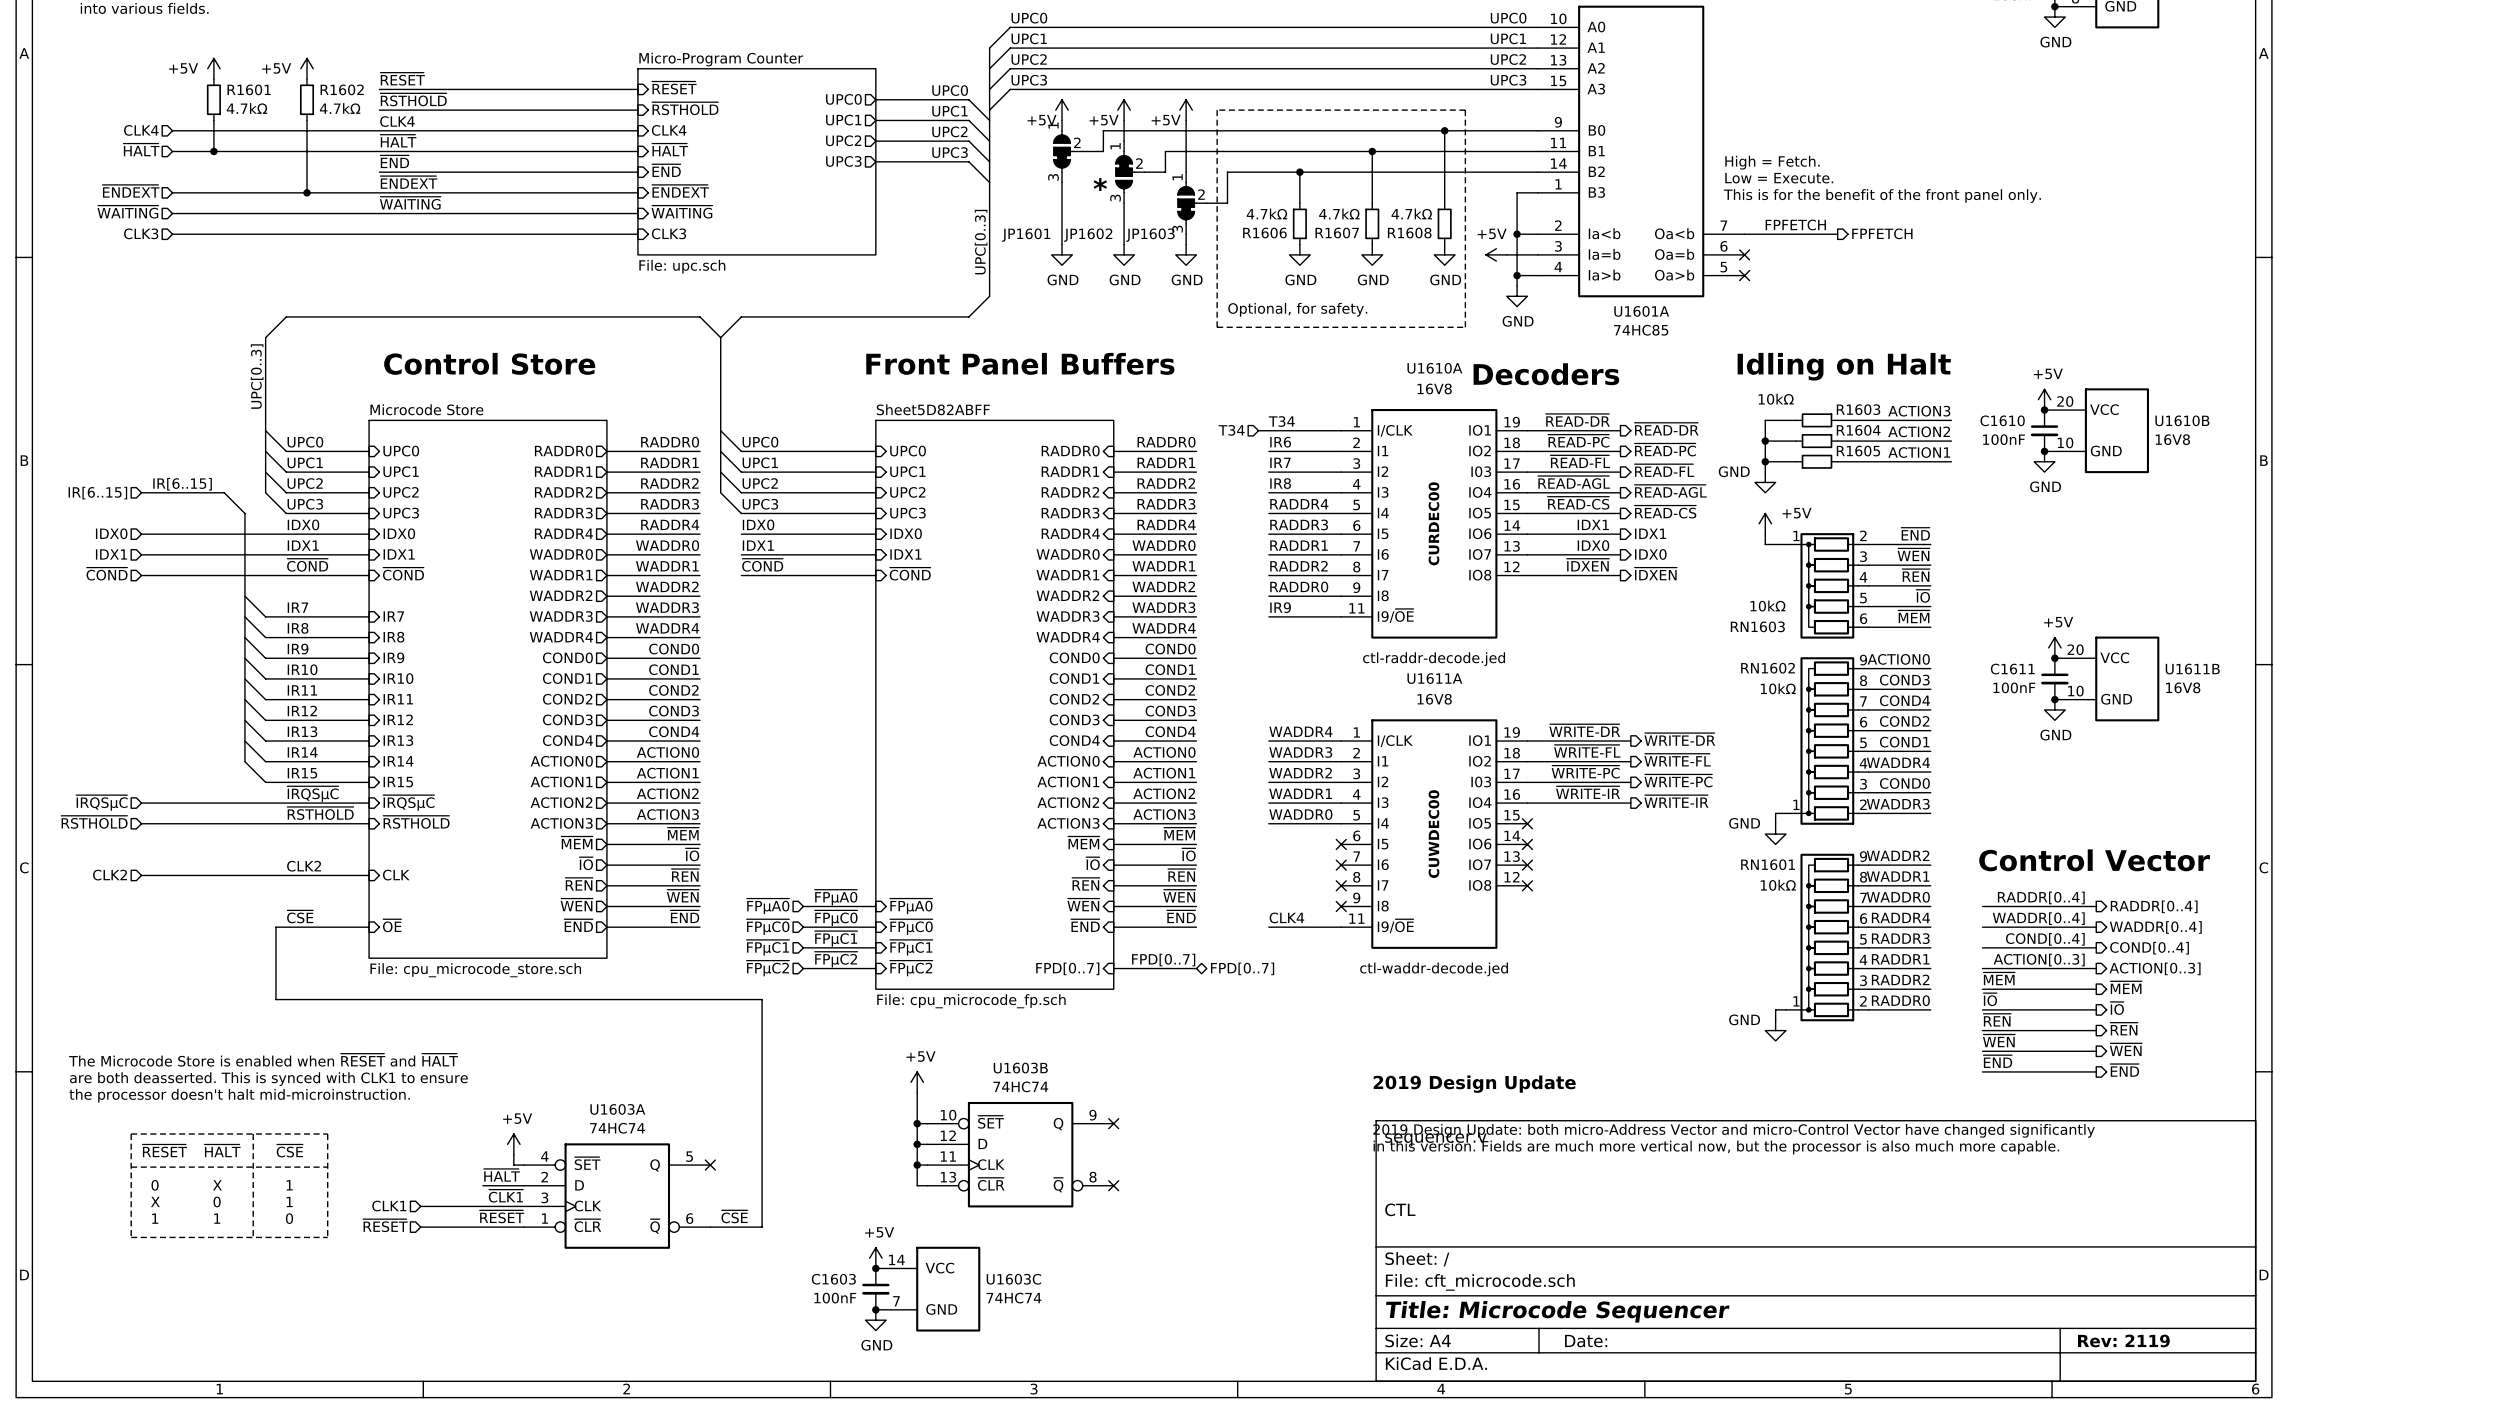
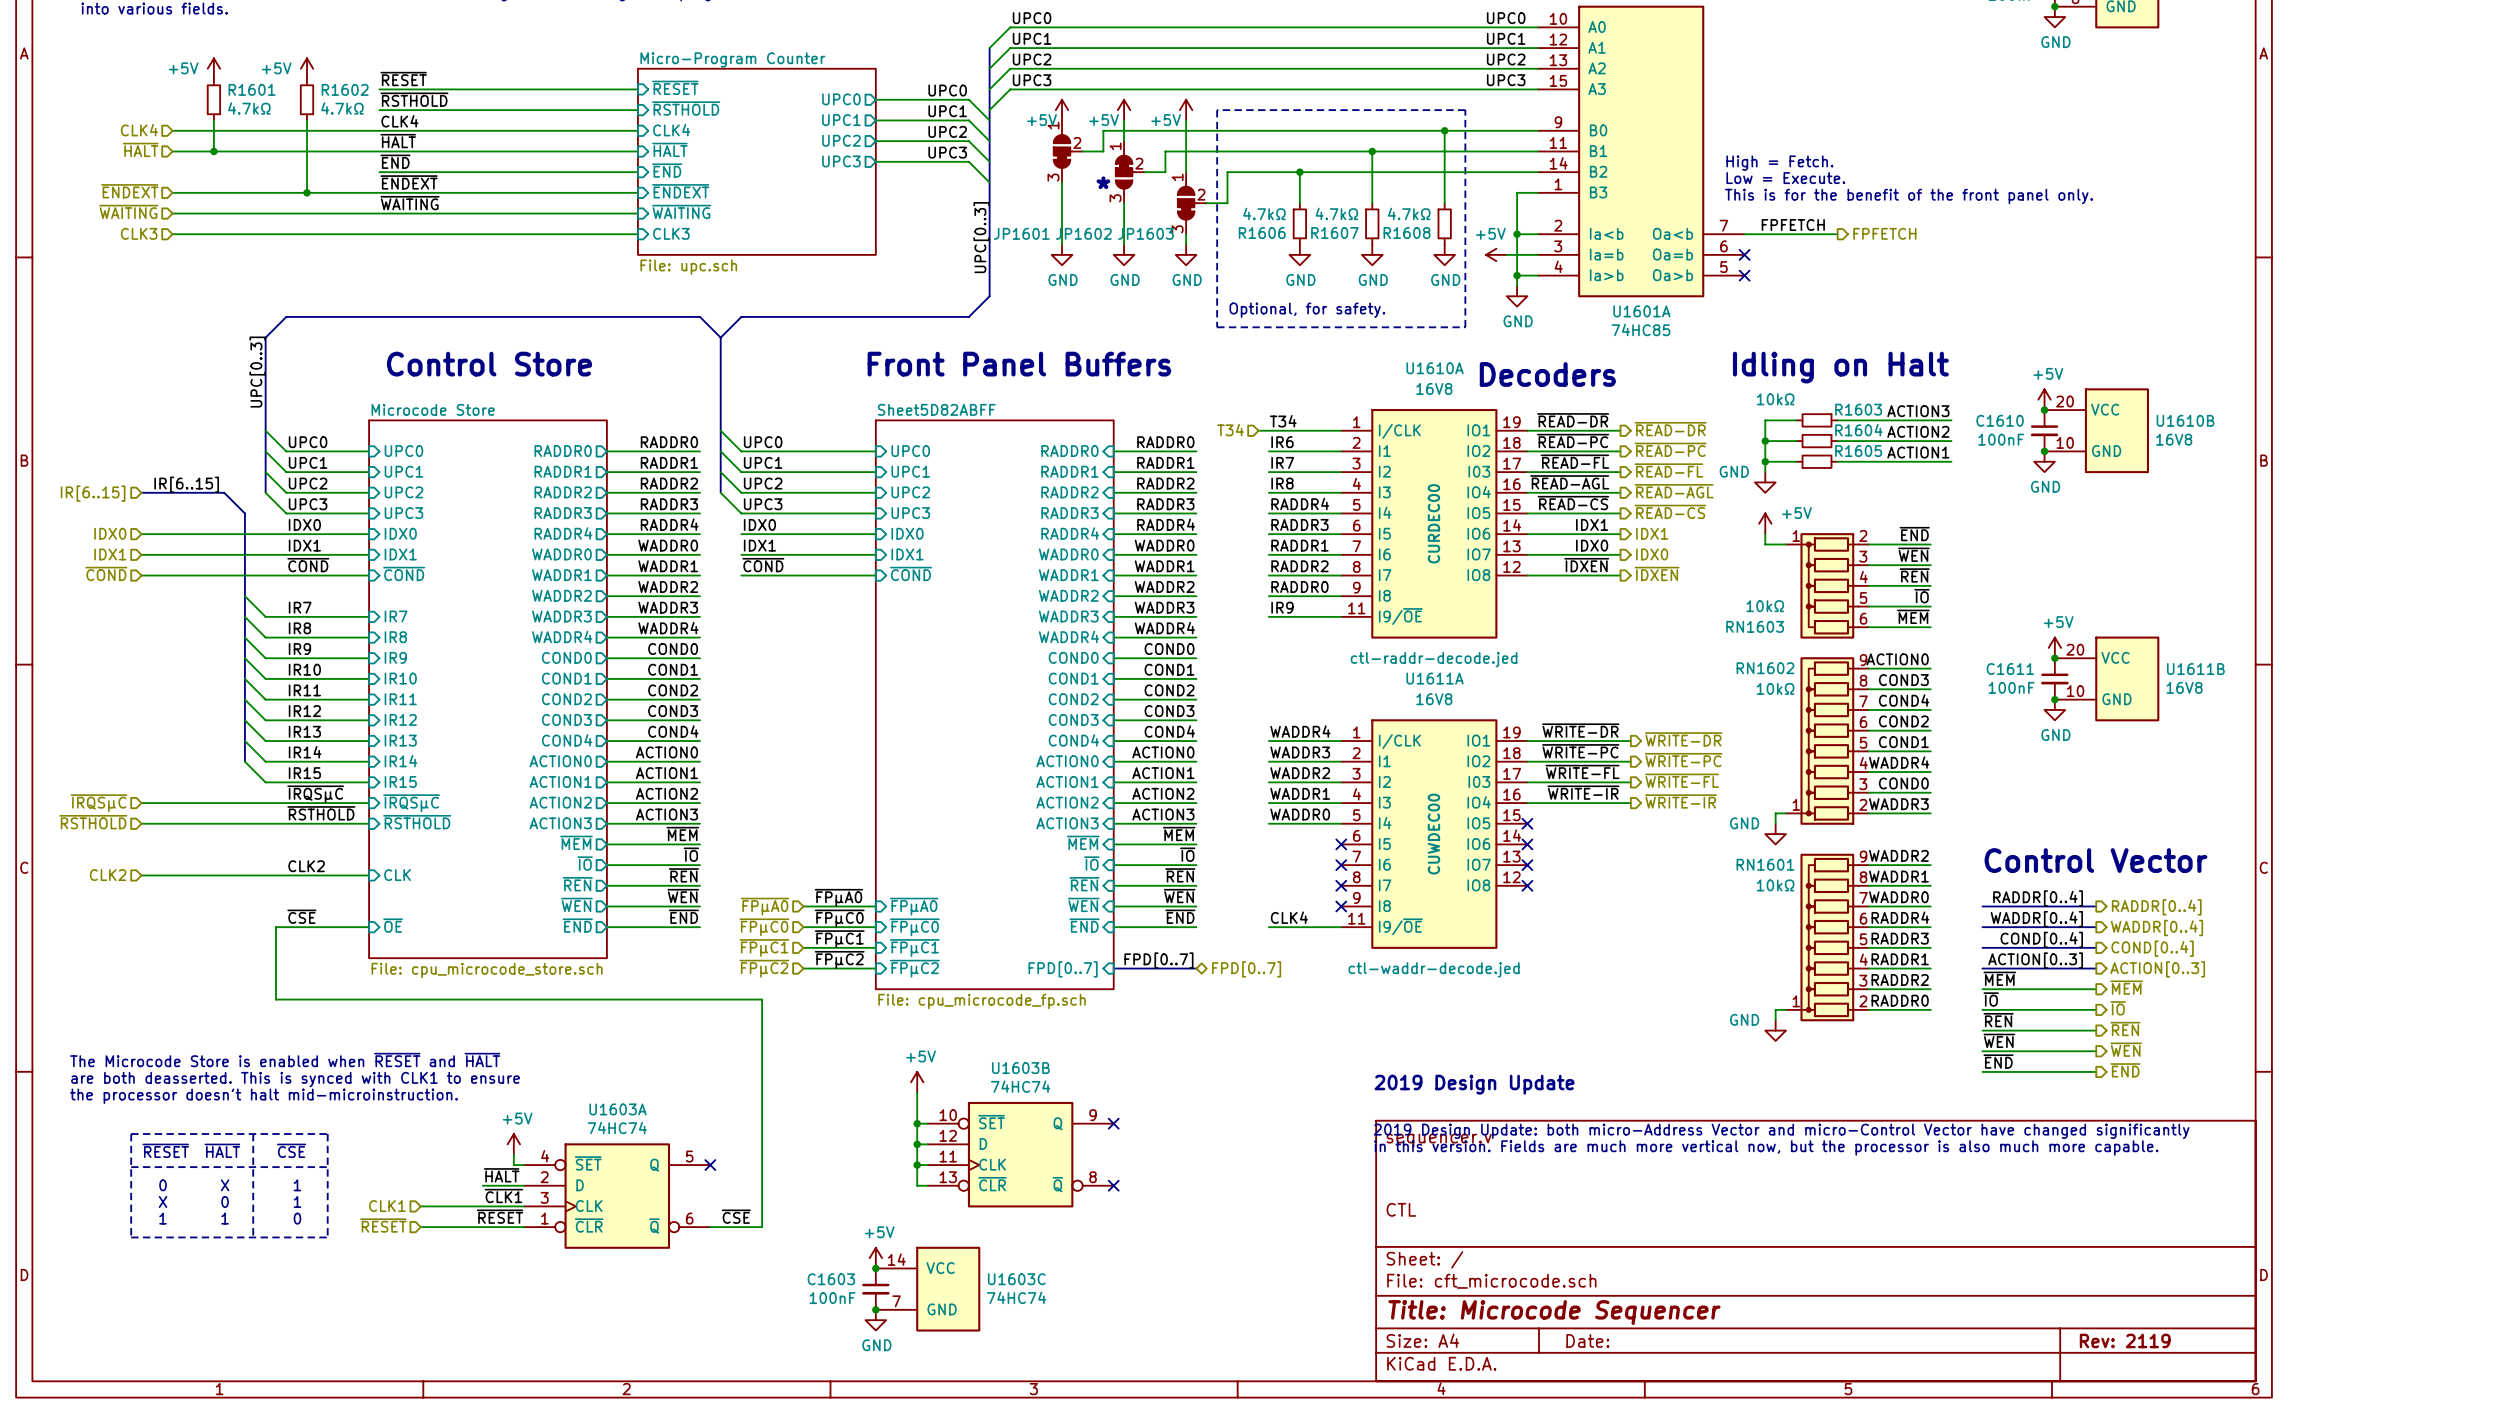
label: ~{WRITE-FL} (1587, 751) -> ~{WRITE-PC} (1580, 751)
hierarchical label: ~{WRITE-FL} (1677, 760) -> ~{WRITE-PC} (1683, 760)
label: ~{WRITE-PC} (1585, 772) -> ~{WRITE-FL} (1582, 771)
hierarchical label: ~{WRITE-PC} (1678, 780) -> ~{WRITE-FL} (1682, 780)

